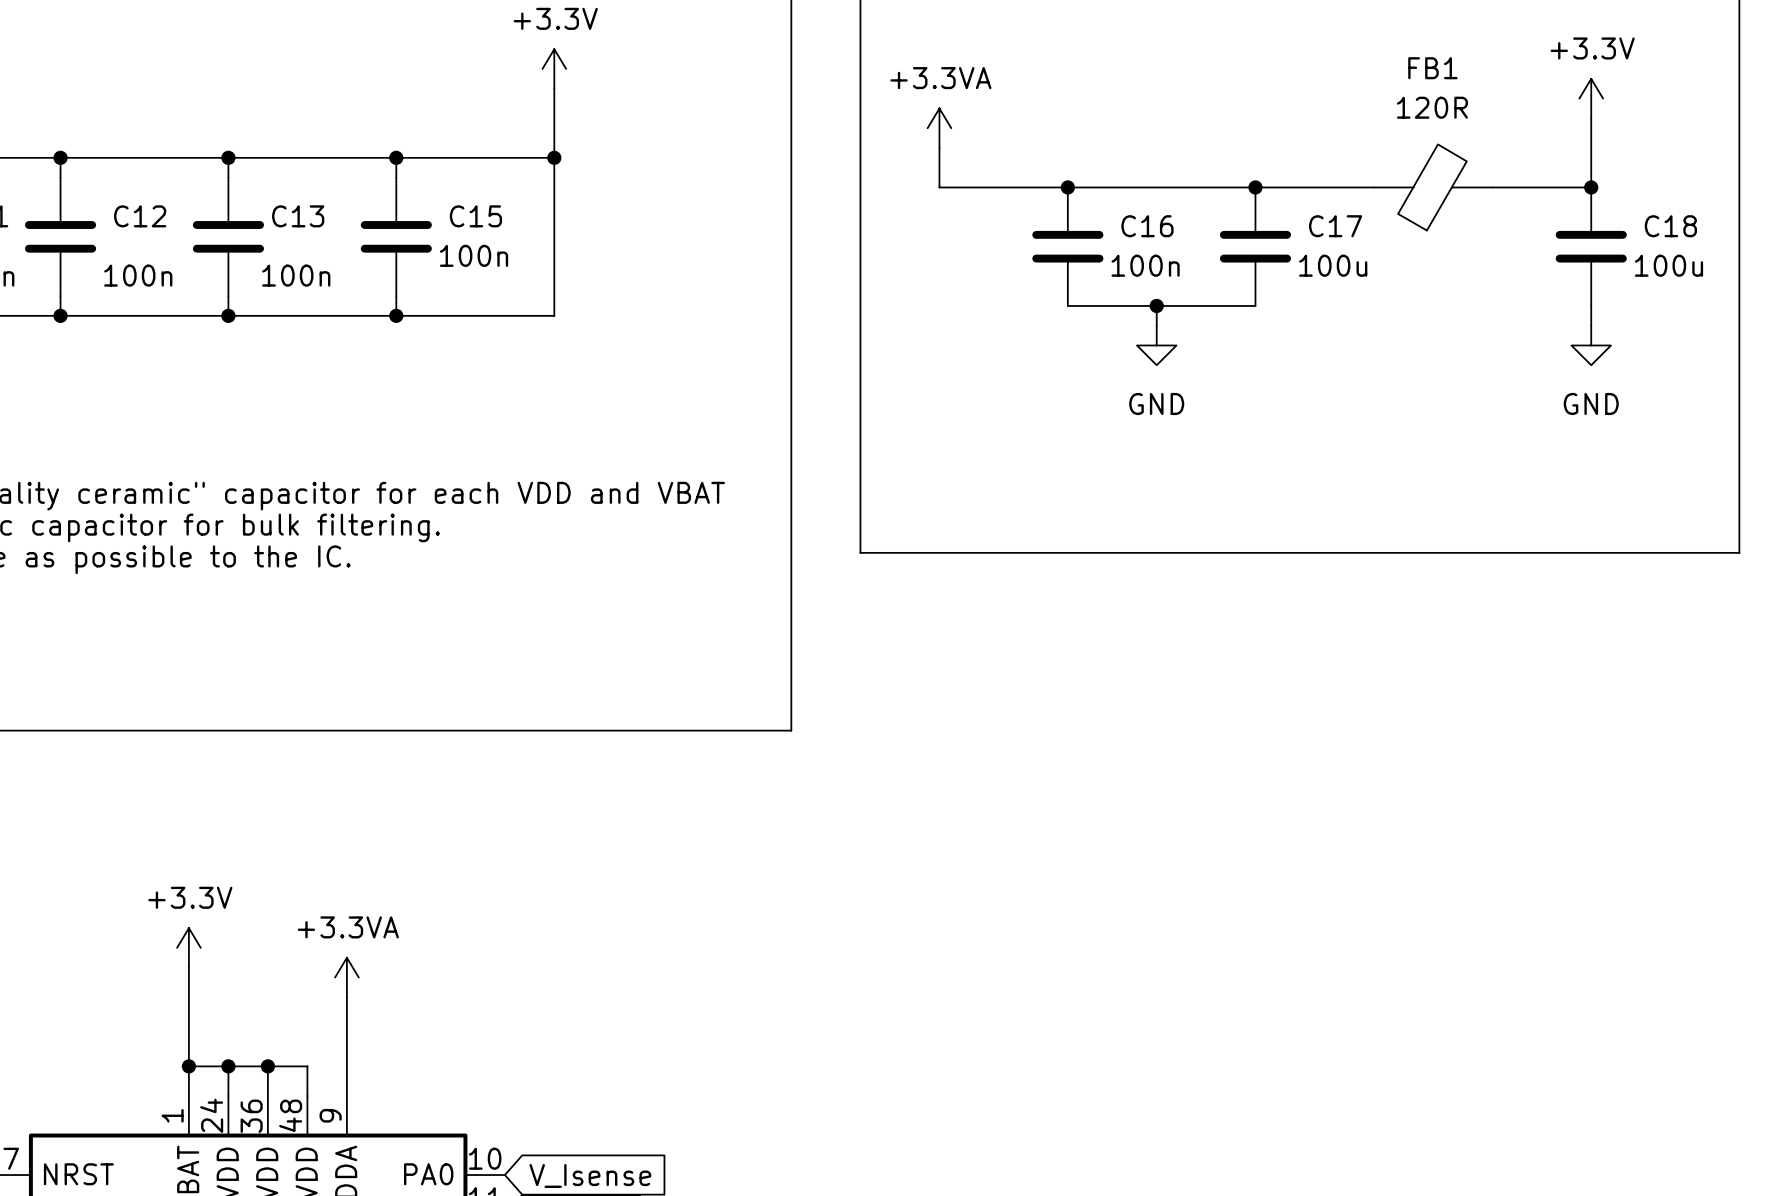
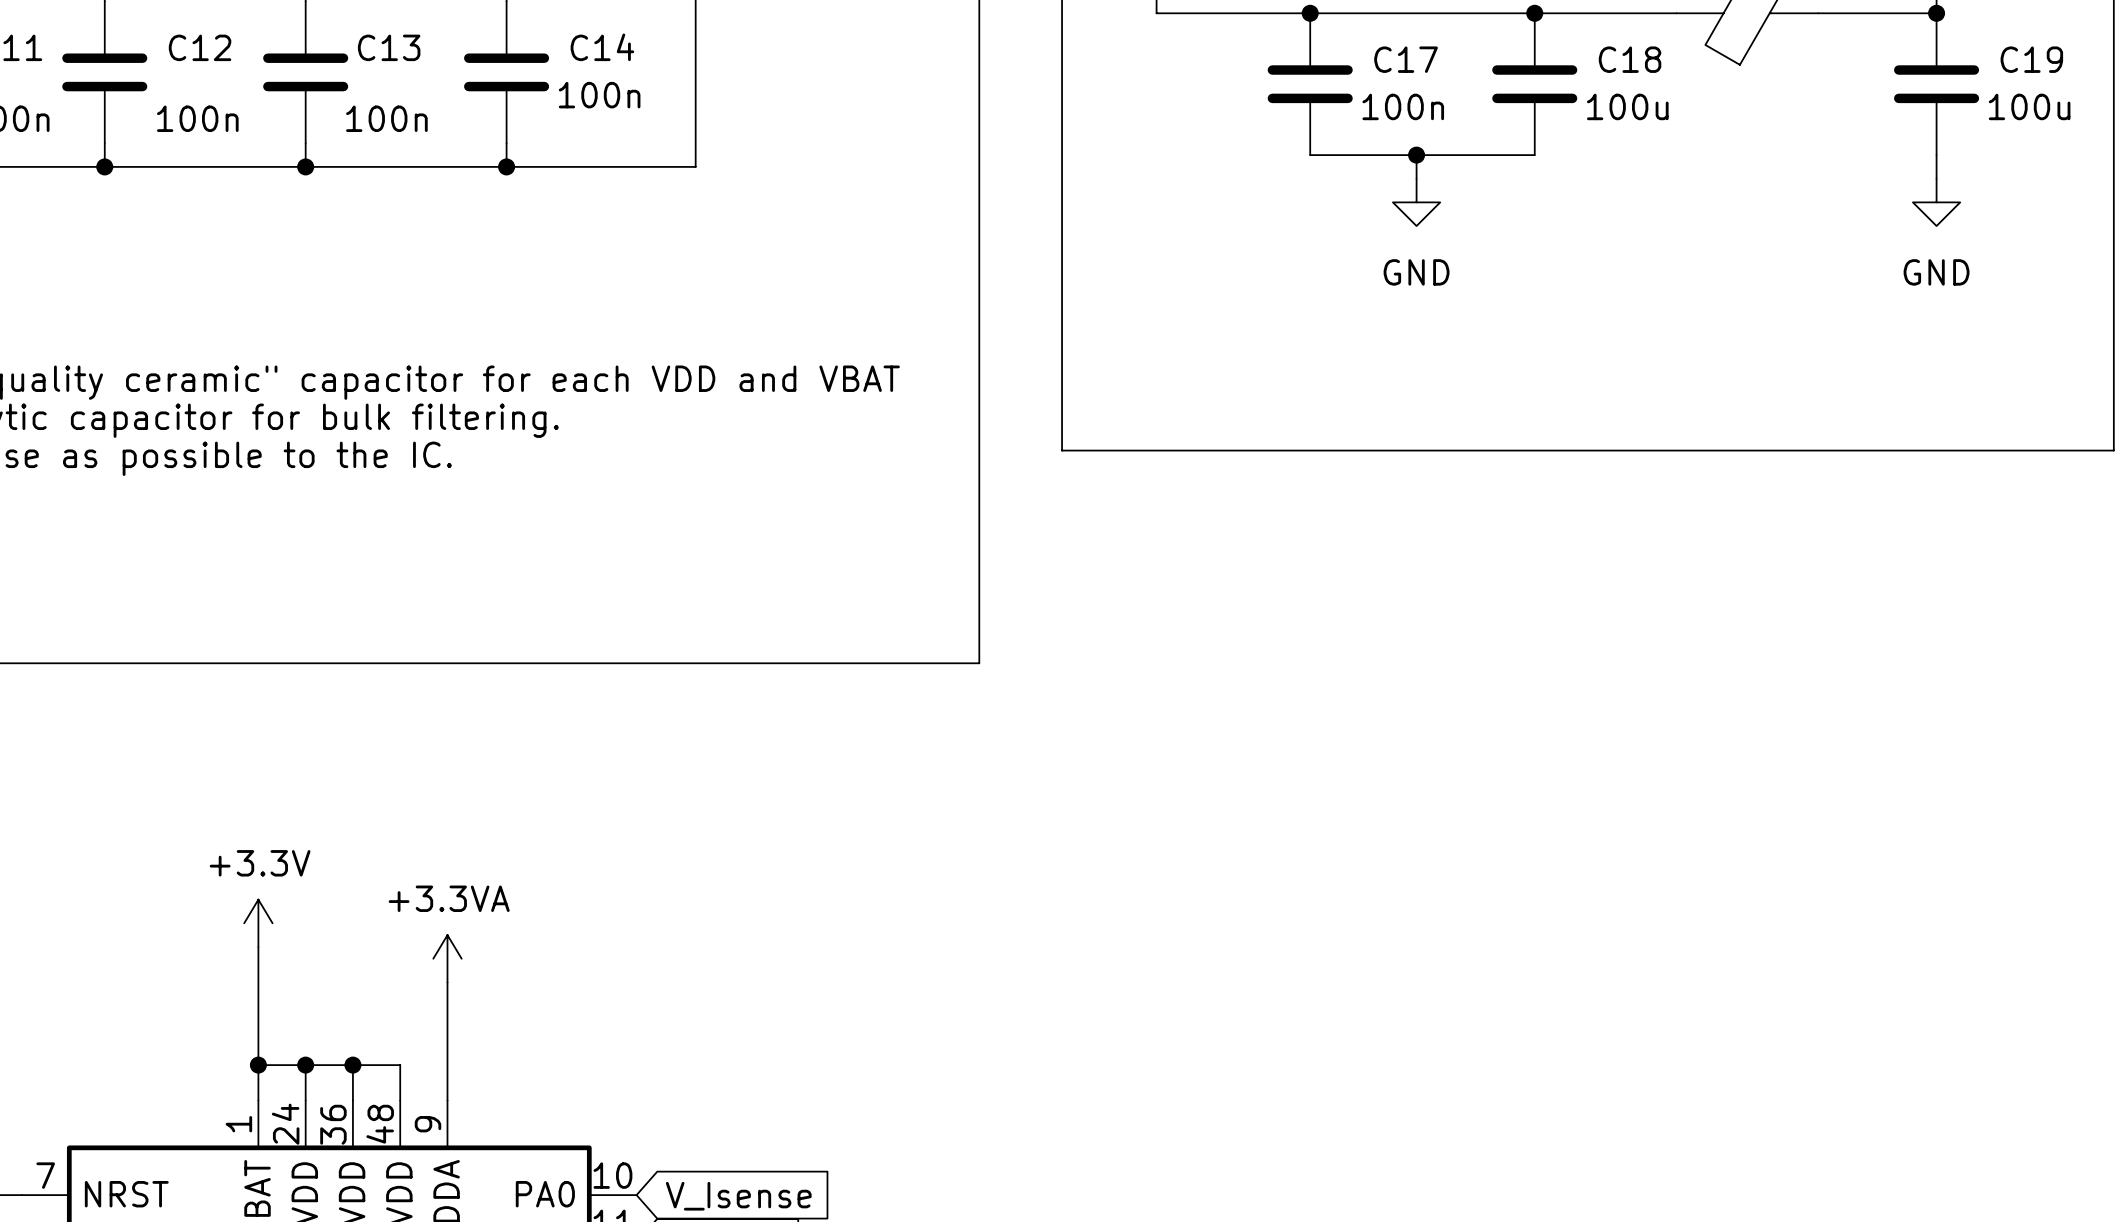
C15 name: C15 (475, 216) -> C14 (602, 47)
C16 name: C16 (1147, 226) -> C17 (1406, 59)
C17 name: C17 (1335, 226) -> C18 (1630, 59)
C18 name: C18 (1670, 226) -> C19 (2031, 59)

